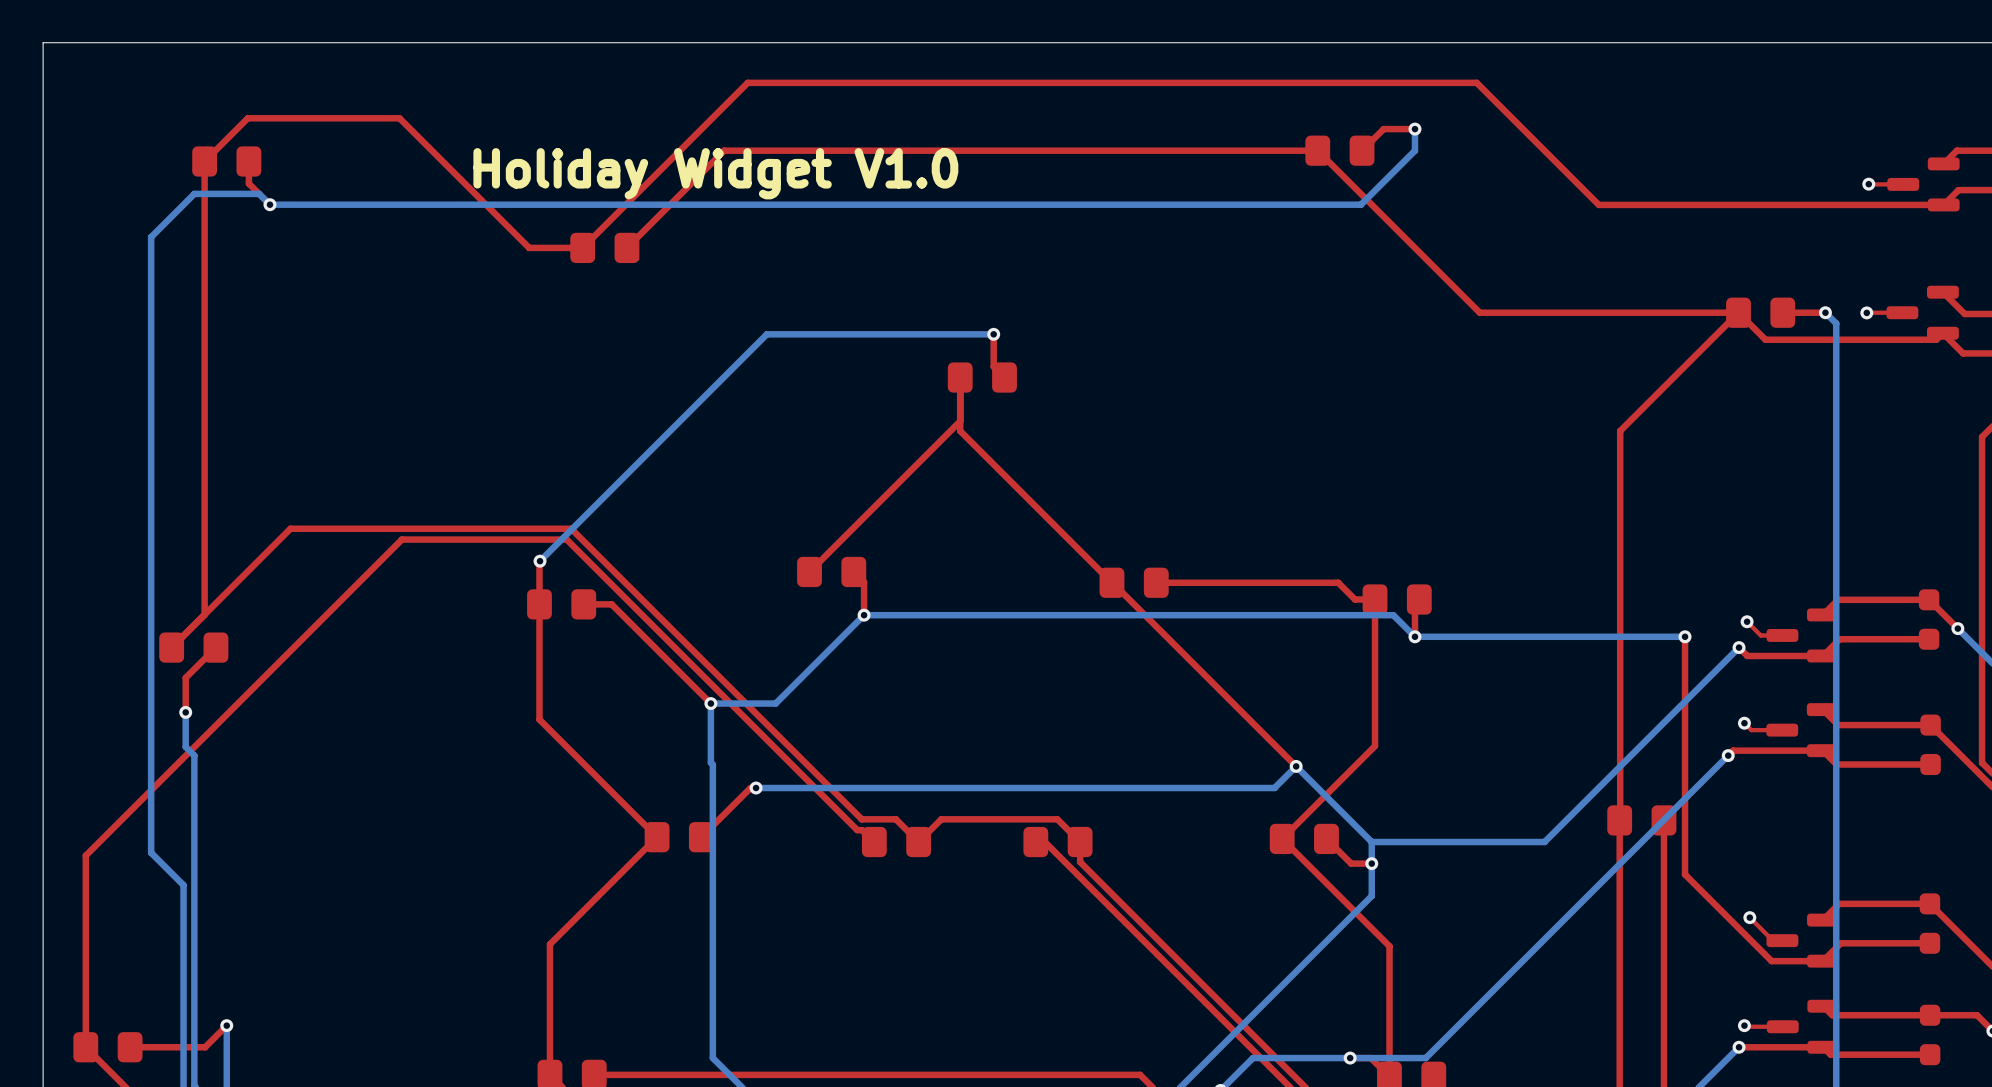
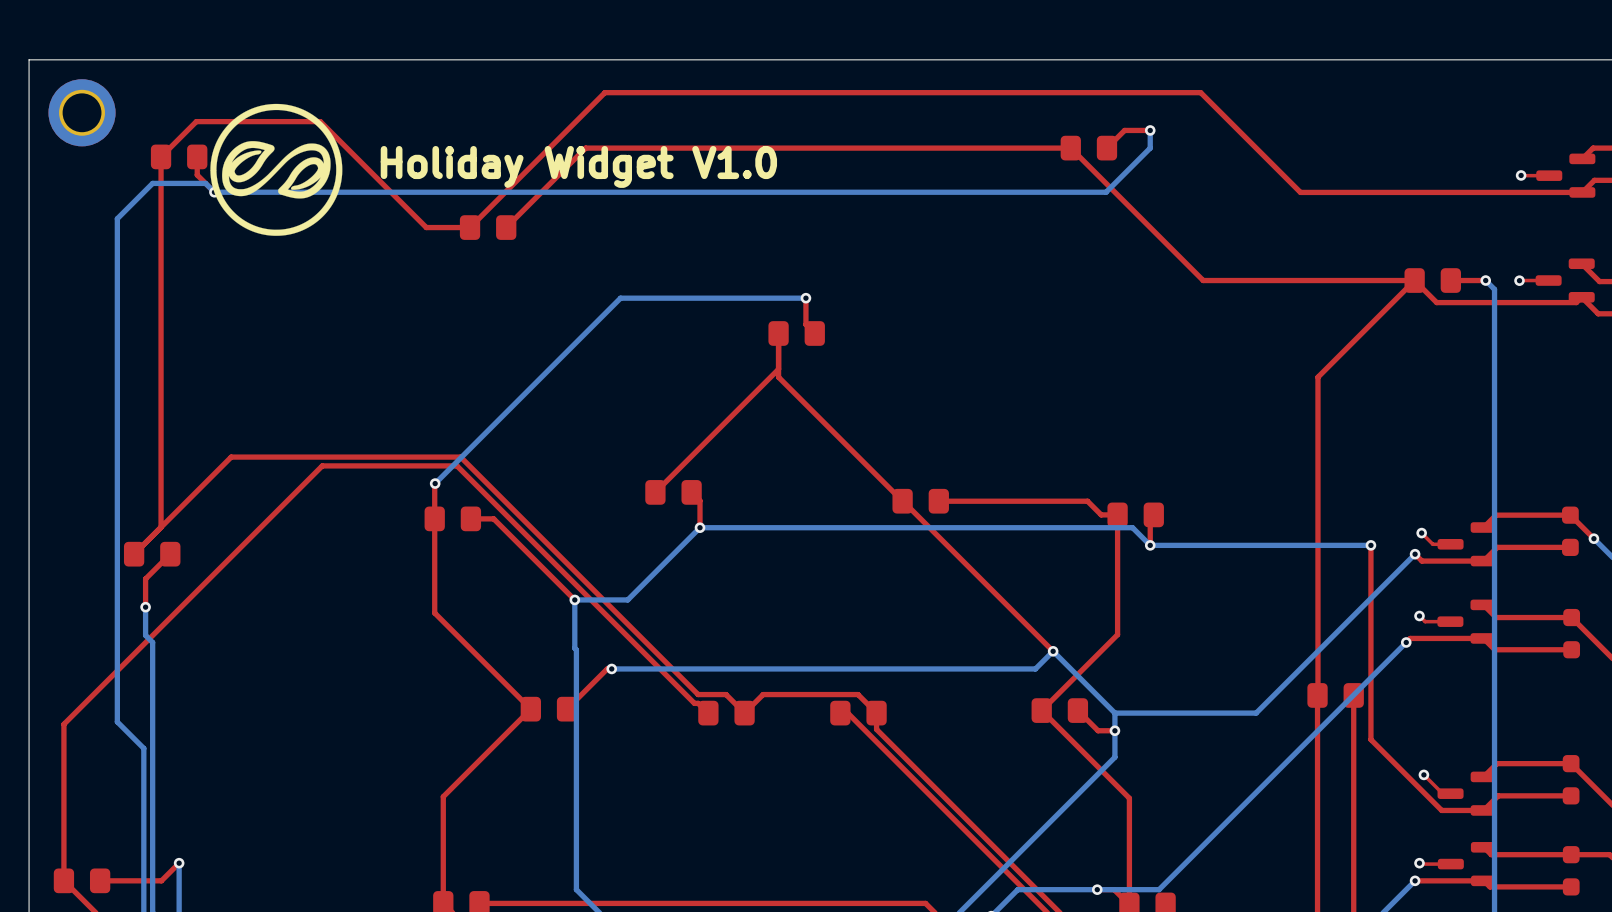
drawing: none -> [210, 103, 343, 236]
part: none -> (82, 112)

